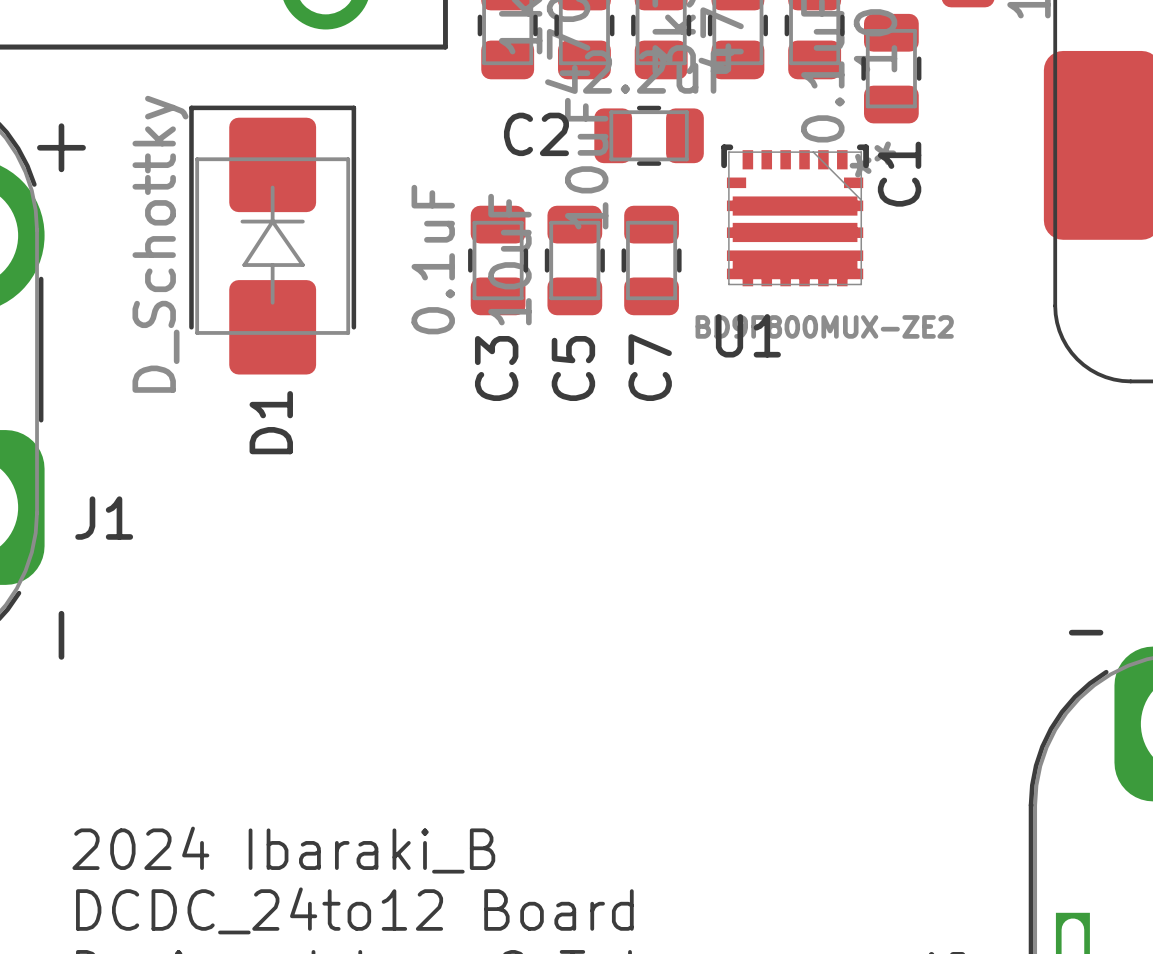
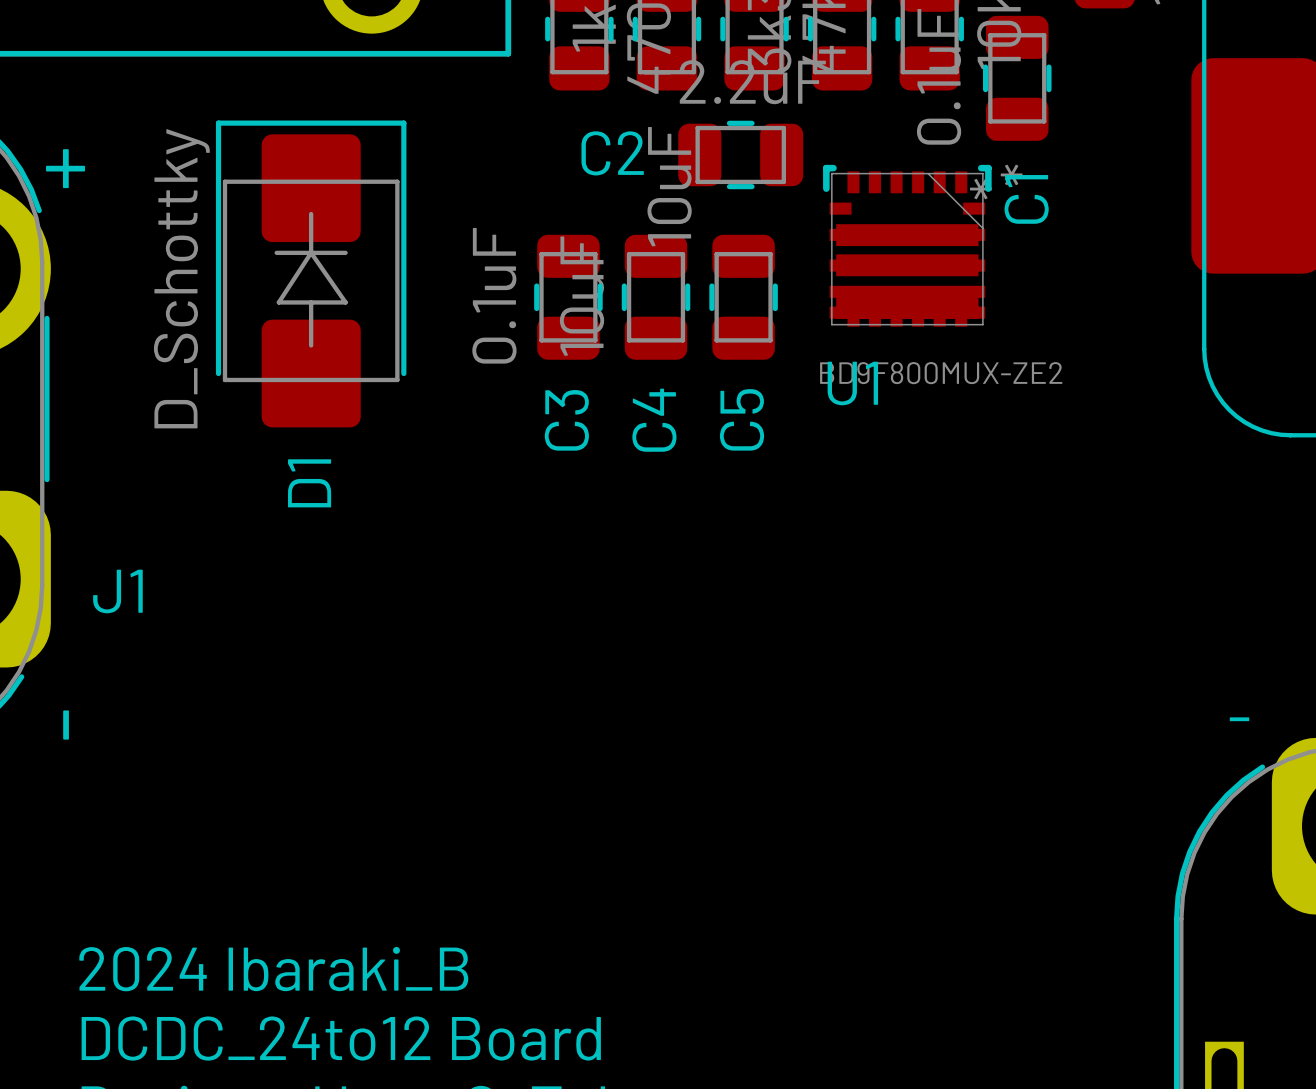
C7 name: C7 (650, 367) -> C5 (742, 419)
C5 name: C5 (573, 368) -> C4 (654, 420)

